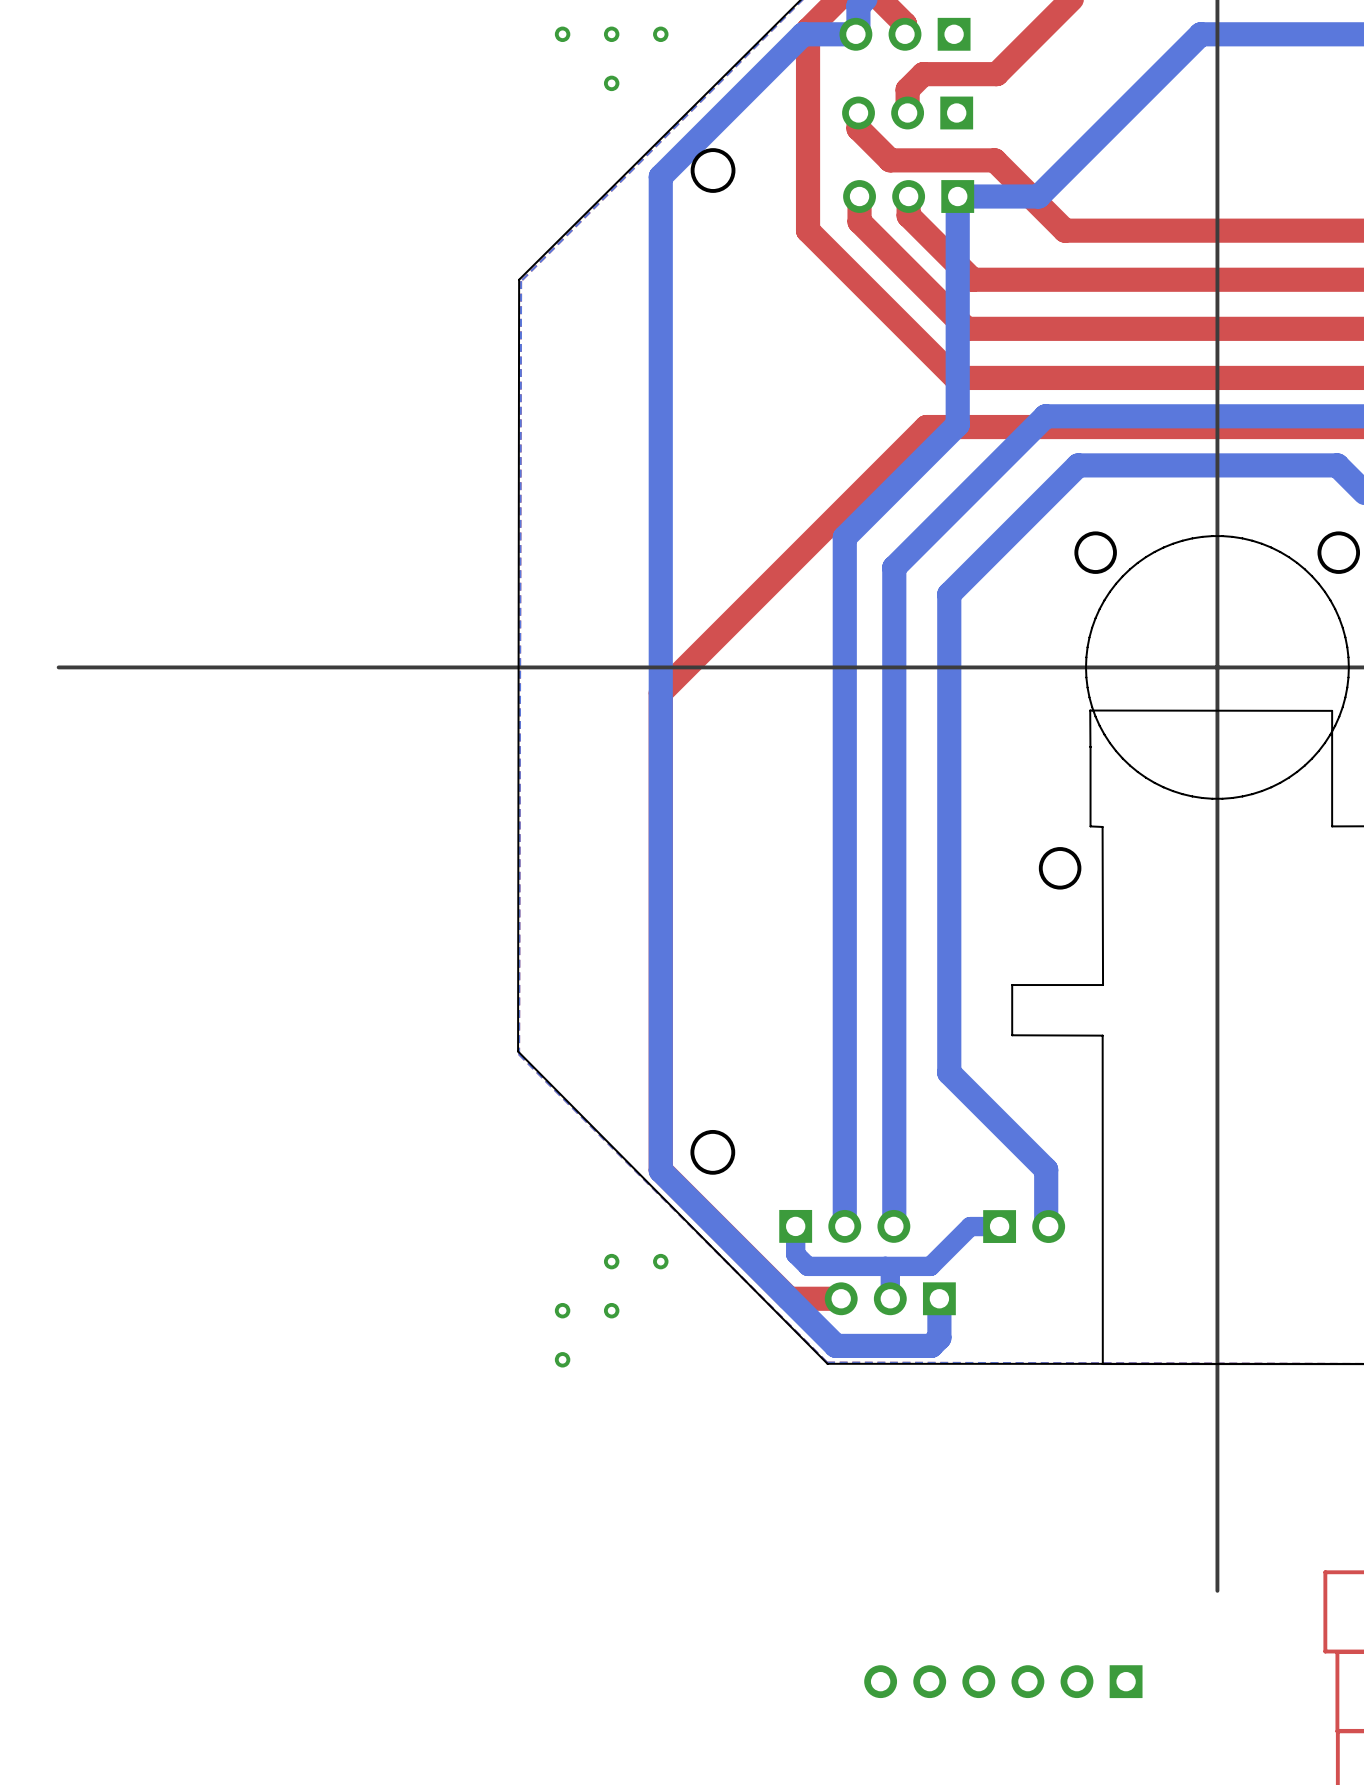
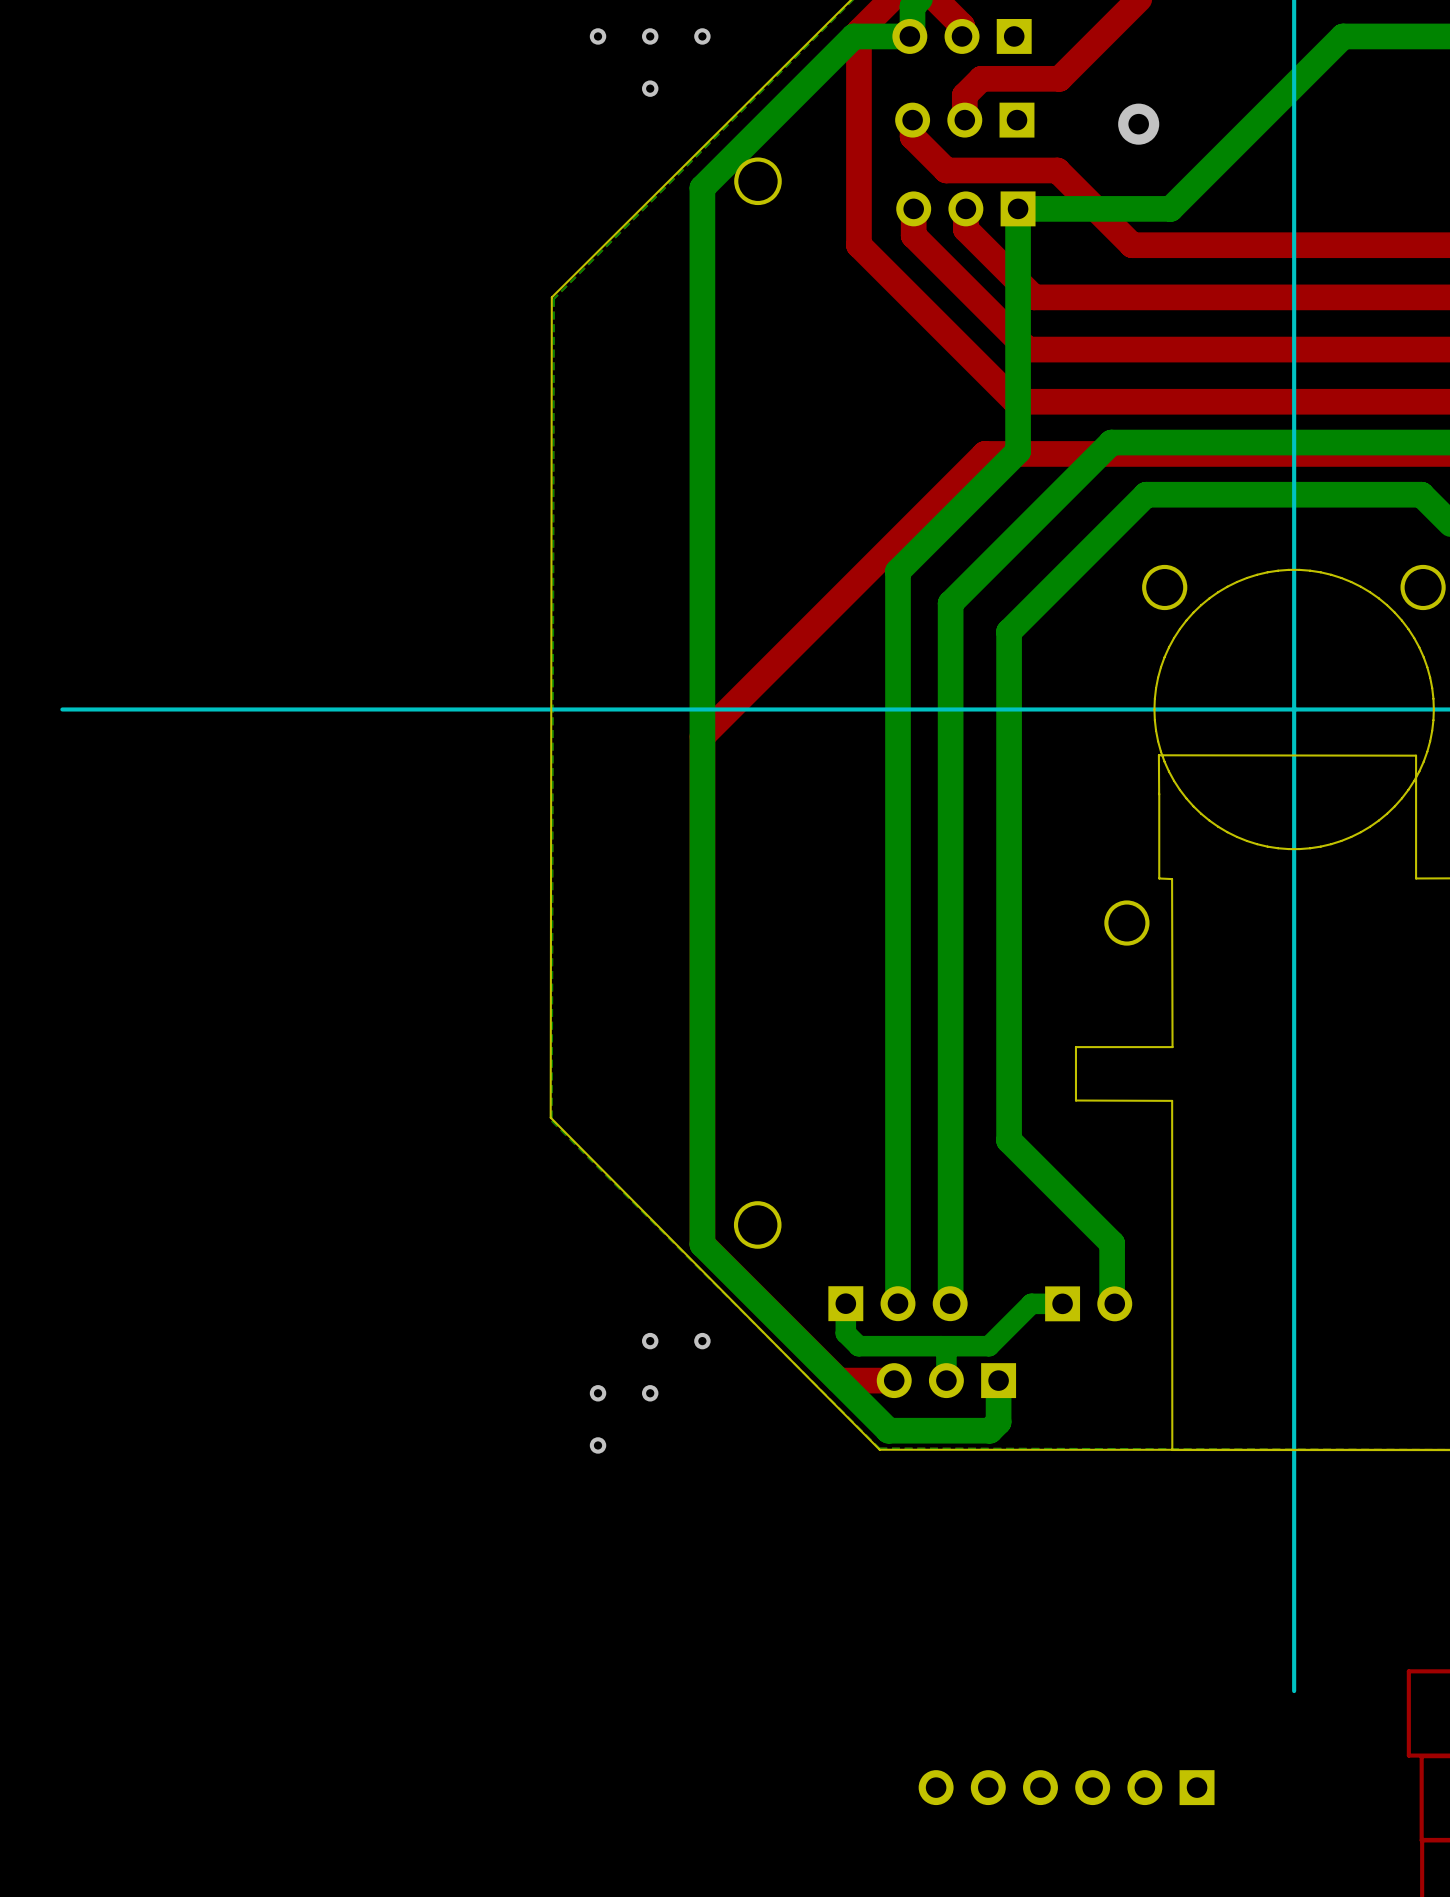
bottom track: (1263, 34) (1200, 34) (1038, 196) -> (1343, 36) (1170, 208) (1104, 208)
via: none -> (1138, 124)

